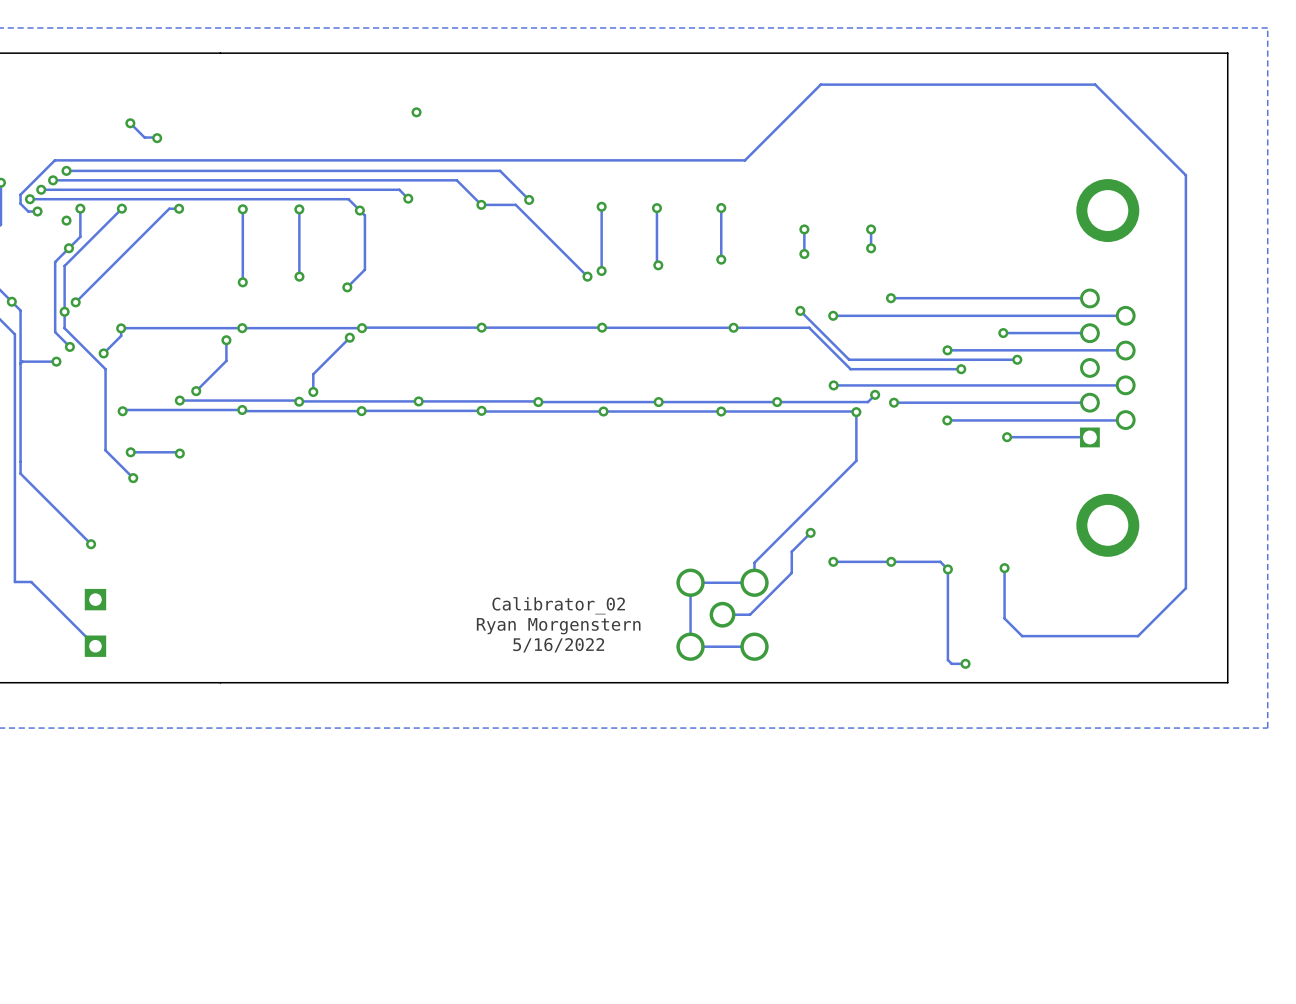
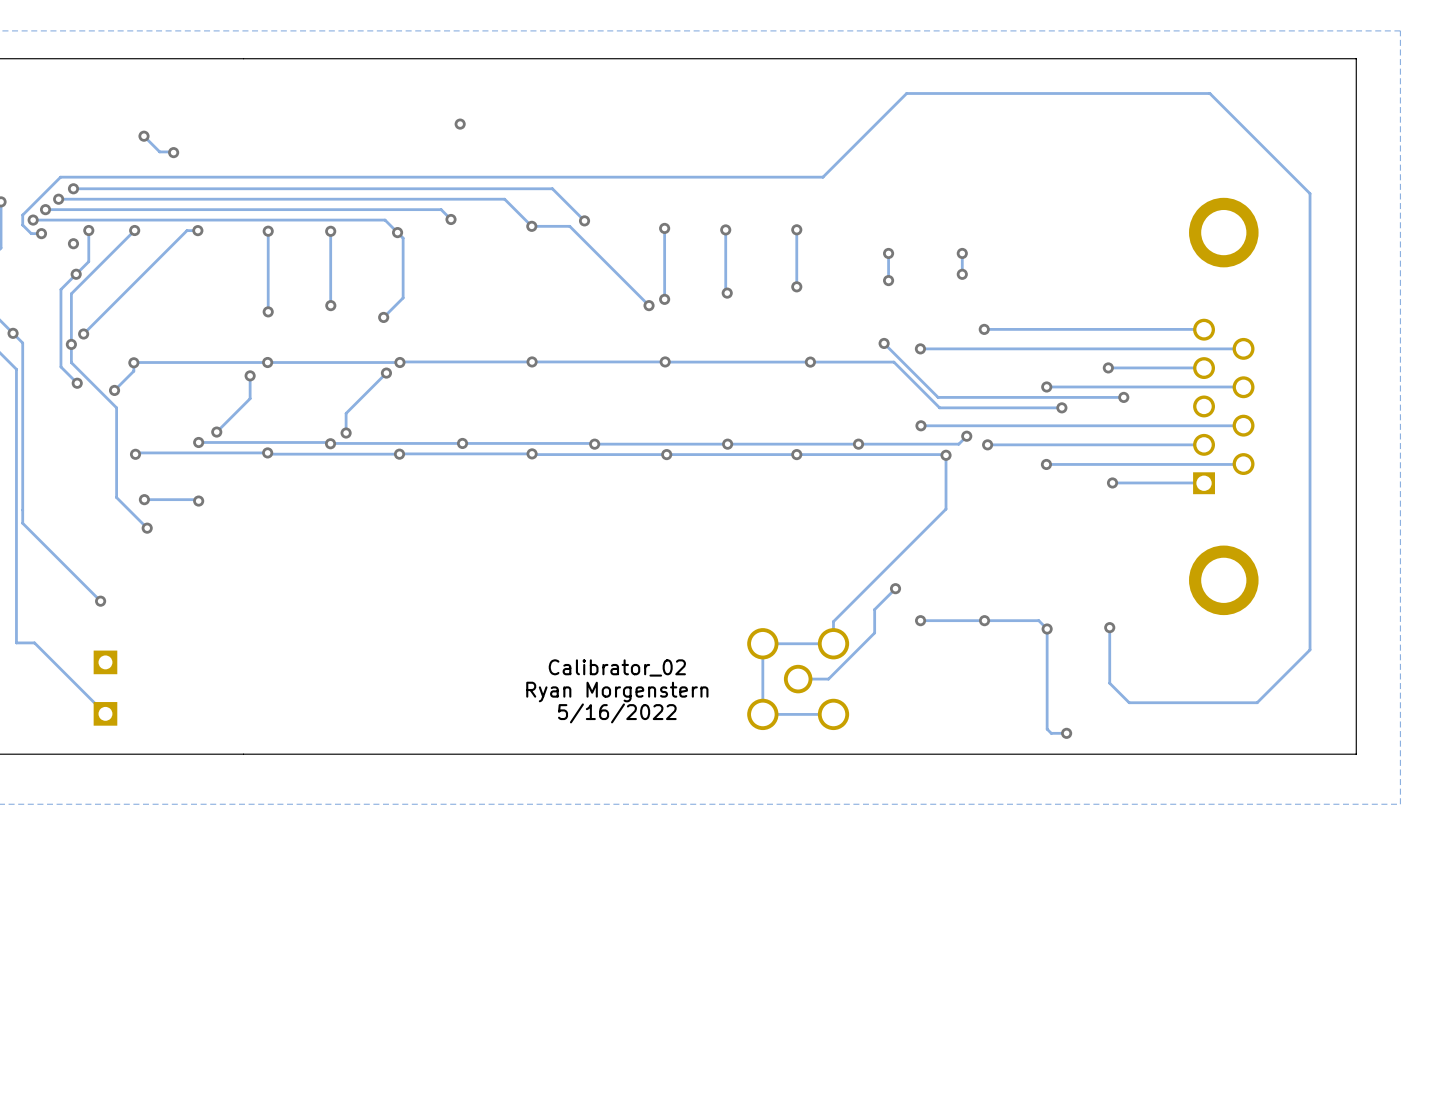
track: (56, 361) (22, 361) (20, 363) -> none
via: (56, 361) -> none

